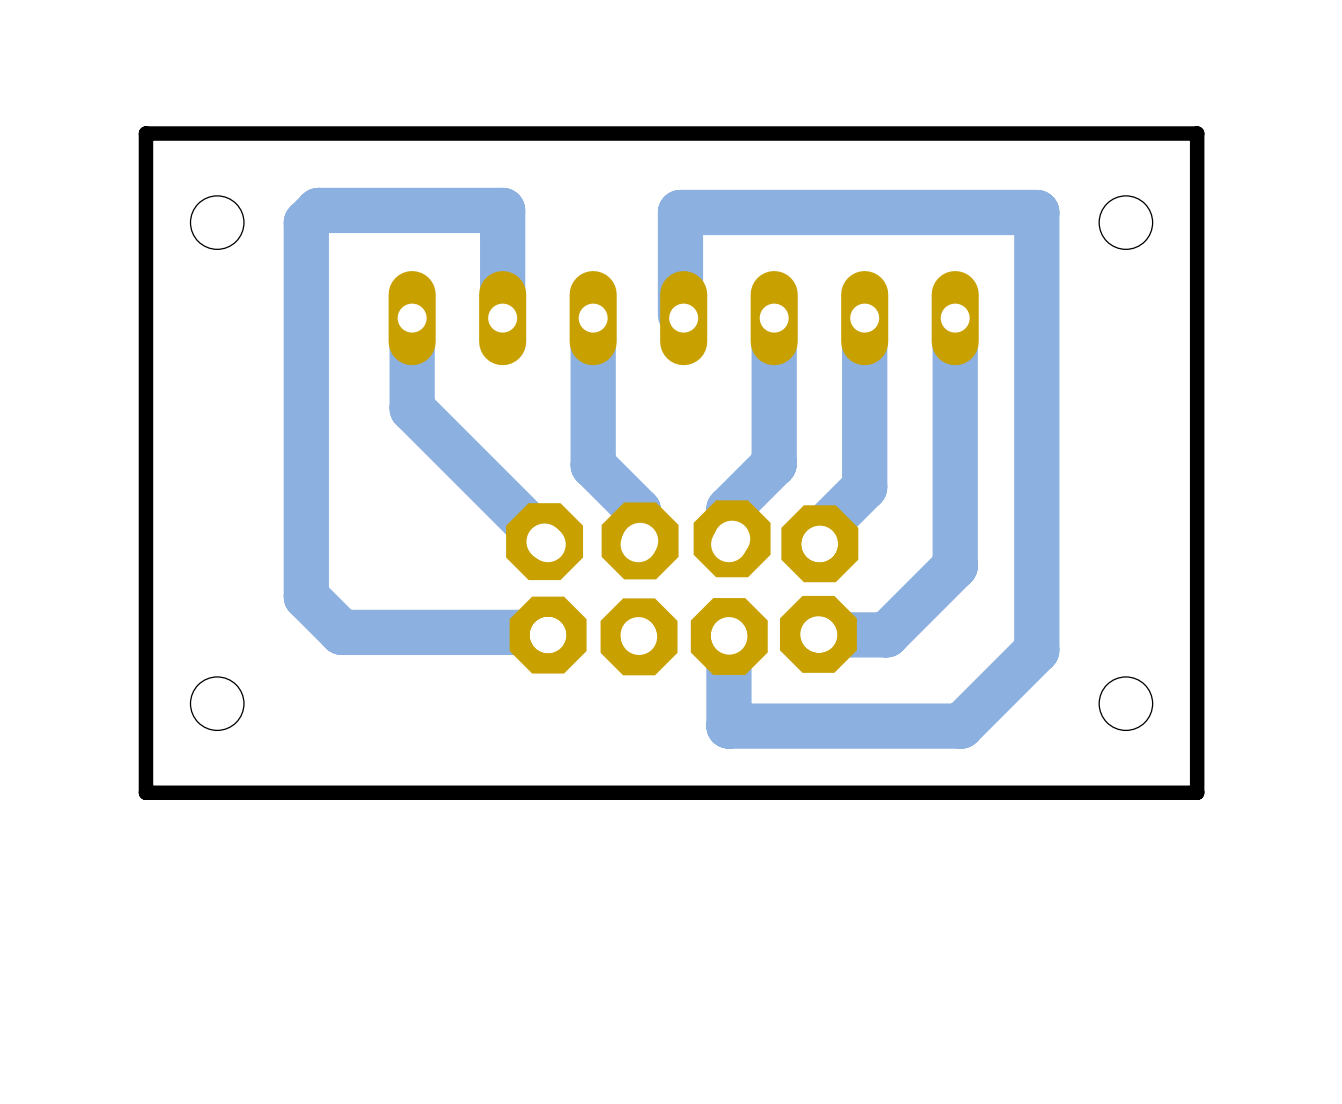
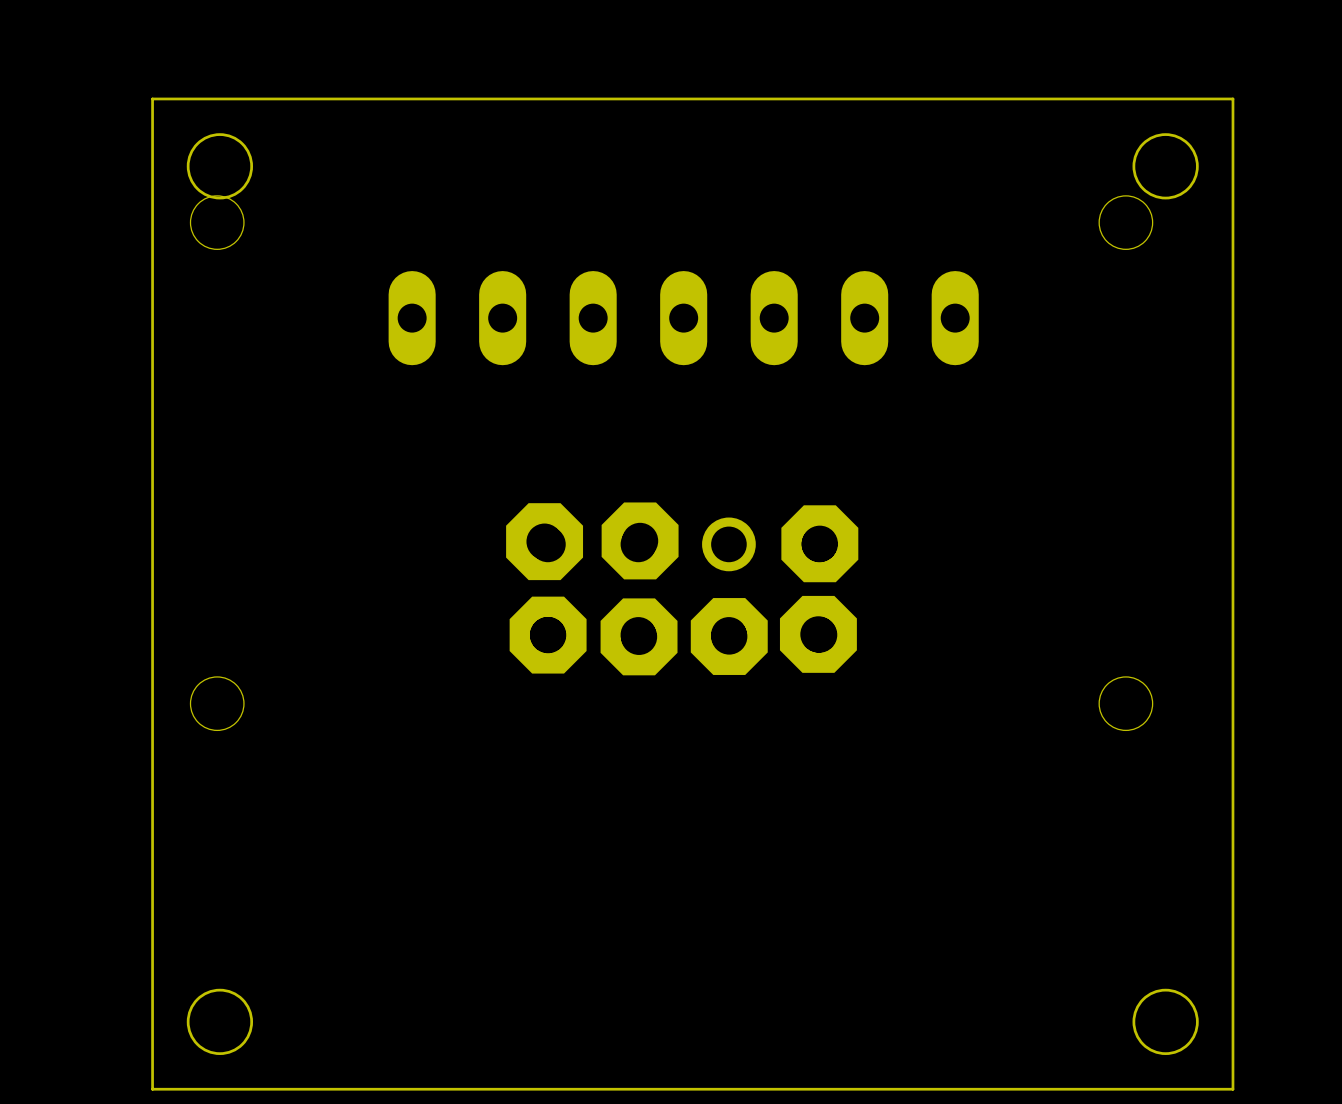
round board edge: none -> [186, 133, 254, 200]
round board edge: none -> [1132, 133, 1199, 200]
board edge: (1197, 133) (1197, 792) (145, 792) (145, 133) (1197, 133) -> (1232, 98) (1232, 1089) (152, 1089) (152, 98) (1232, 98)
bottom track: (412, 318) (412, 408) (547, 544) -> none
bottom track: (502, 318) (502, 210) (318, 210) (306, 222) (306, 596) (341, 632) (545, 632) (547, 634) -> none
bottom track: (593, 318) (593, 465) (638, 510) (638, 544) -> none
bottom track: (683, 318) (680, 314) (680, 212) (1036, 212) (1036, 650) (960, 726) (728, 726) (728, 634) -> none
bottom track: (774, 318) (774, 463) (728, 509) (728, 544) -> none
bottom track: (864, 318) (864, 487) (819, 532) (819, 544) -> none
bottom track: (955, 318) (955, 566) (886, 634) (819, 634) -> none
part: (732, 538) -> none
round board edge: none -> [186, 988, 254, 1055]
round board edge: none -> [1132, 988, 1199, 1055]

